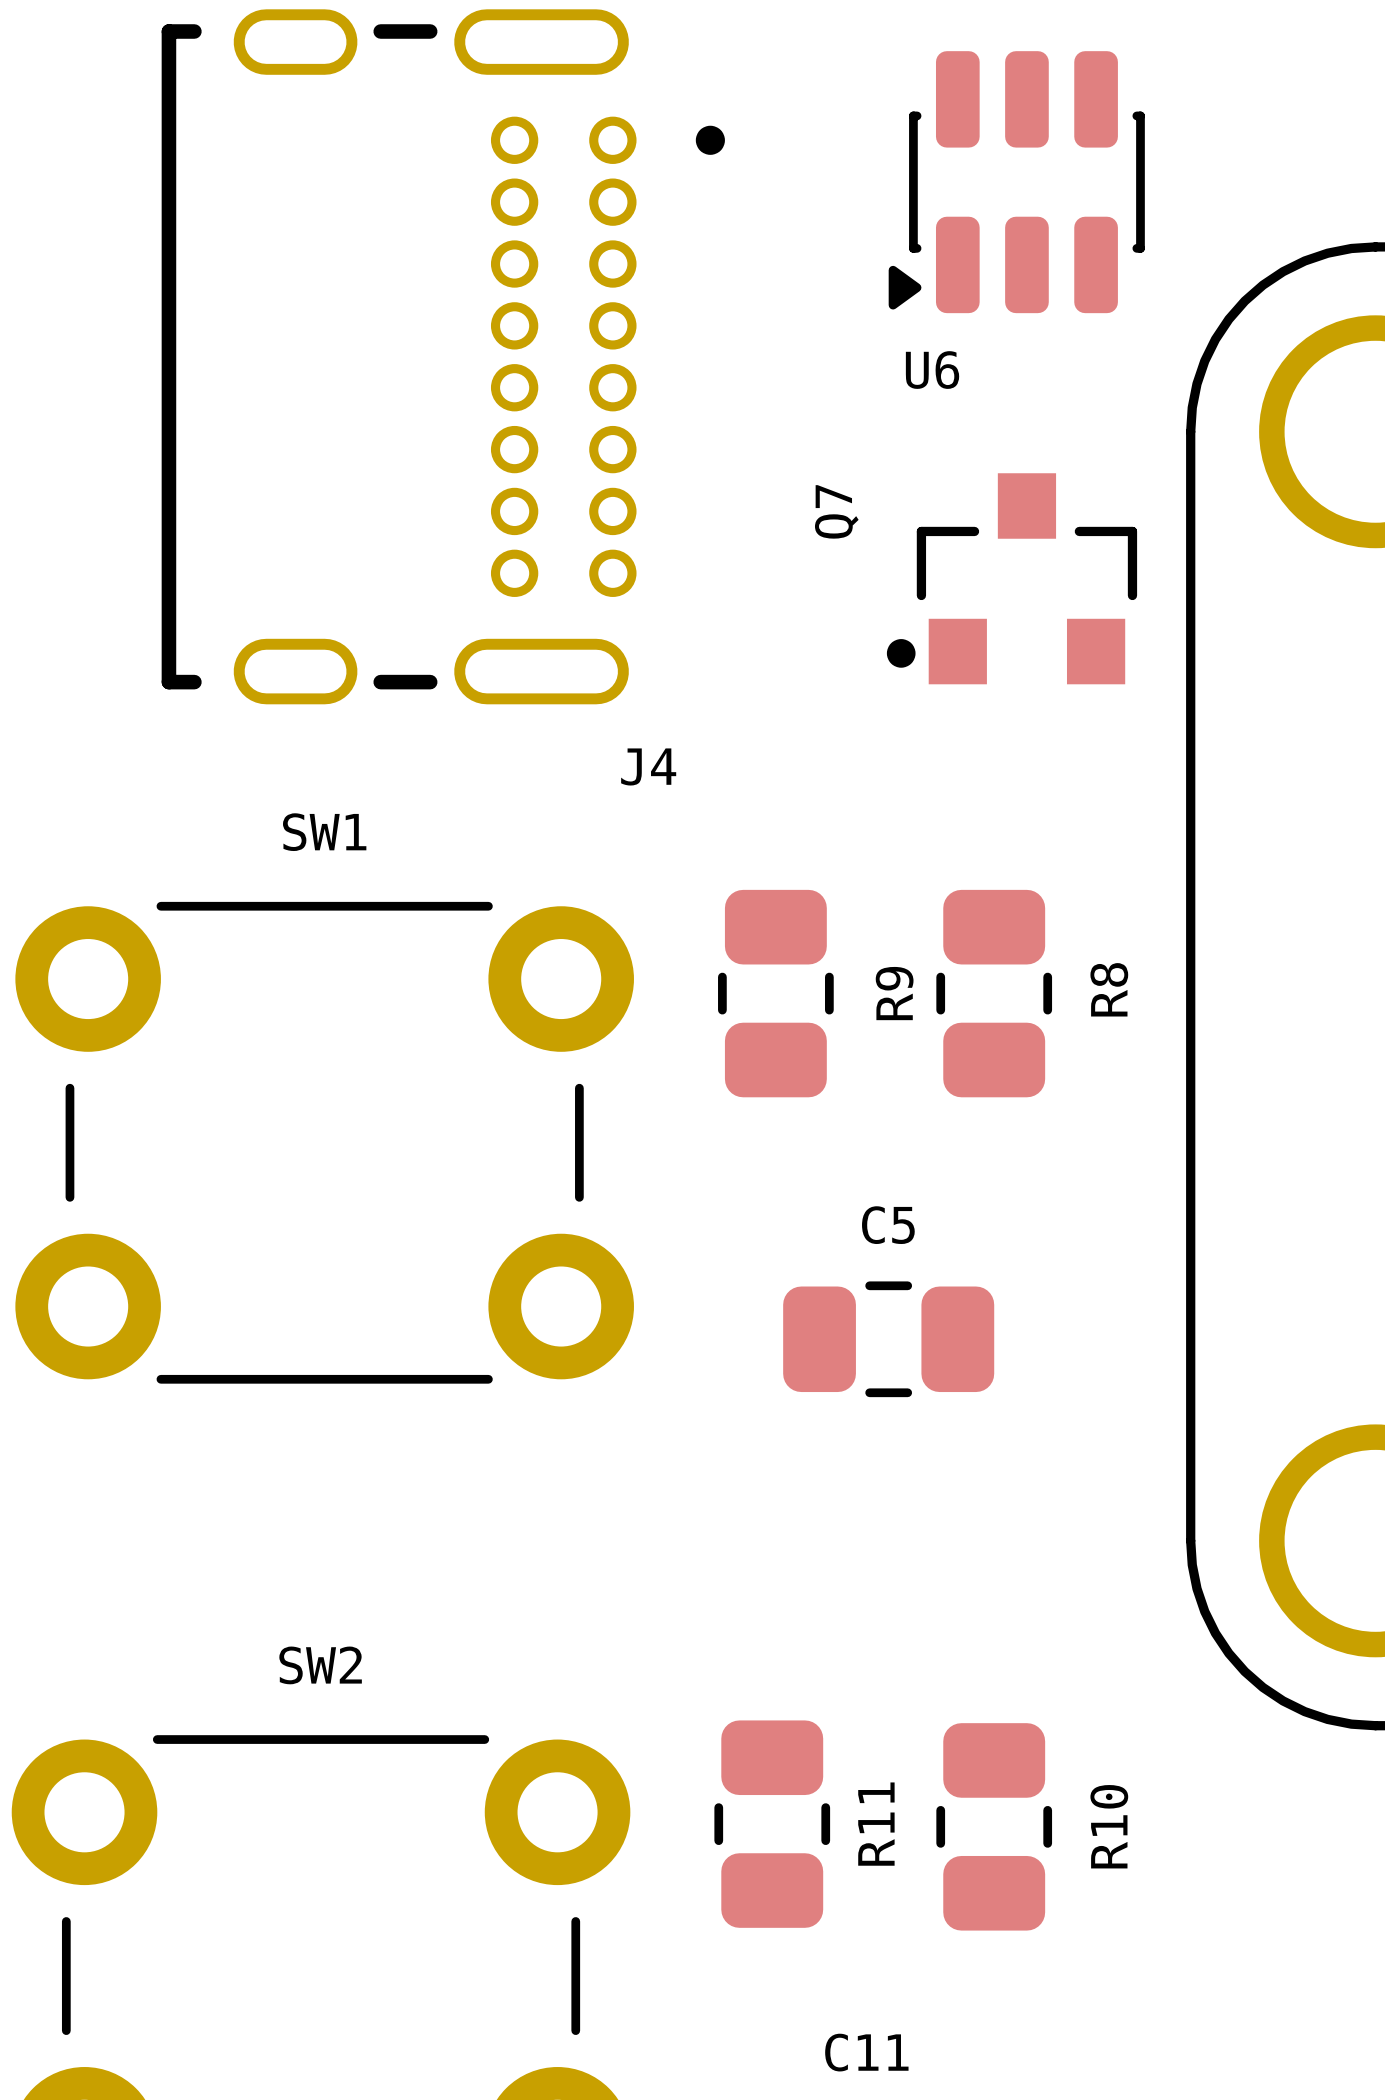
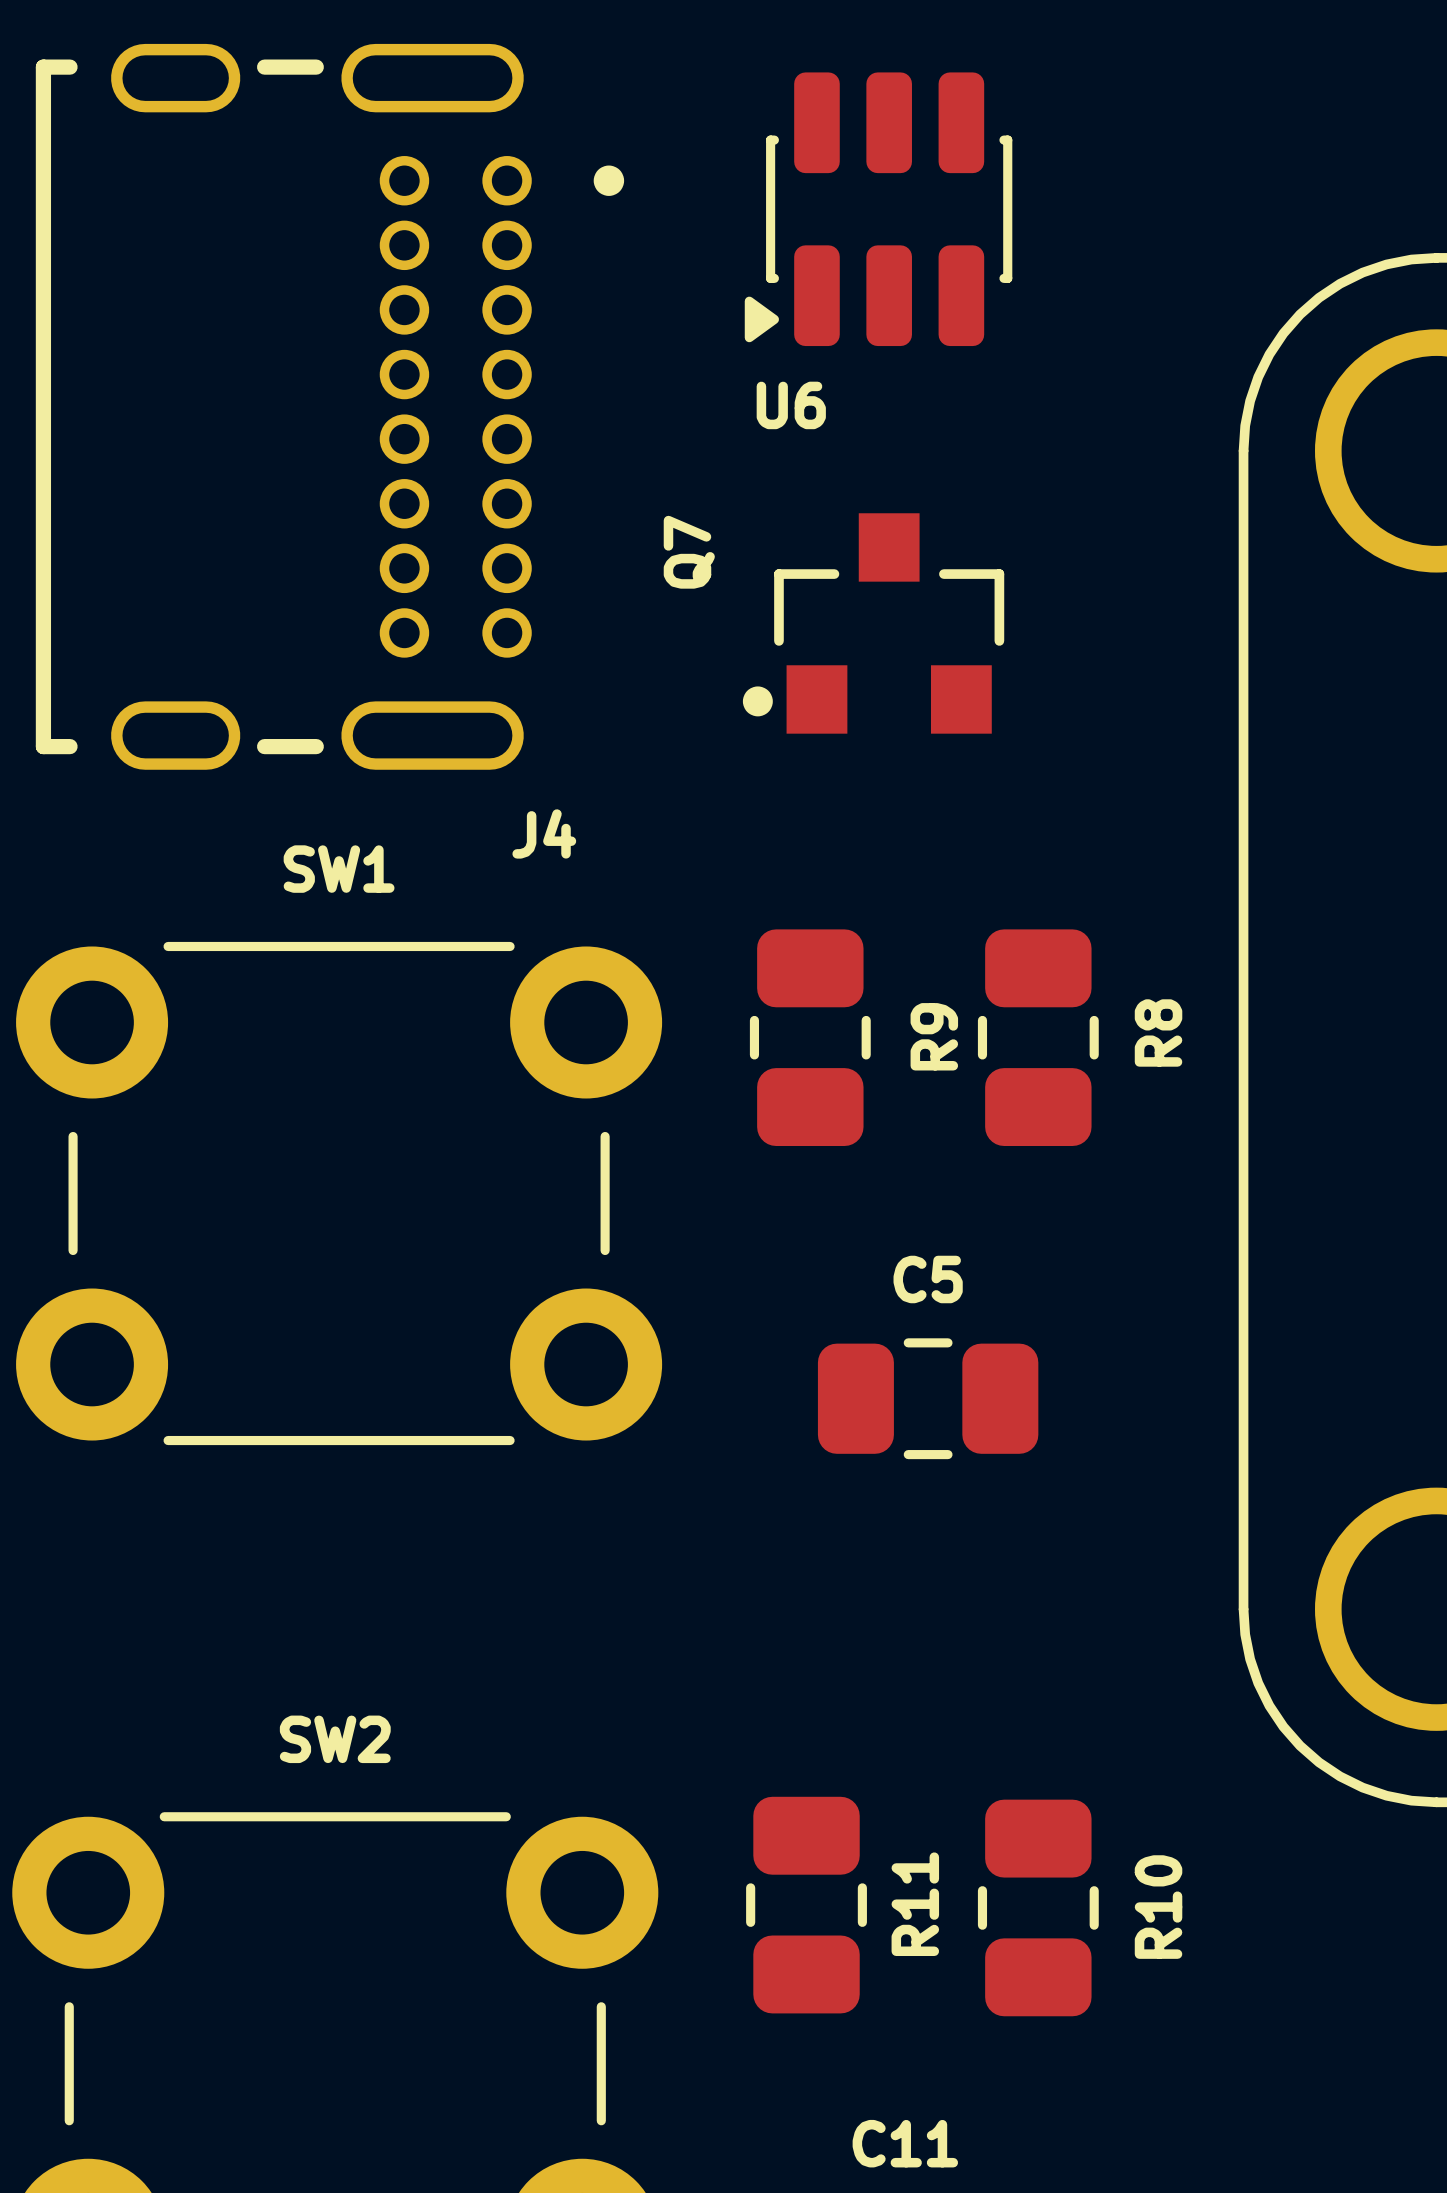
U6 position: (1016, 182) -> (878, 209)
J4 position: (443, 356) -> (329, 406)
Q7 position: (1011, 578) -> (873, 623)

